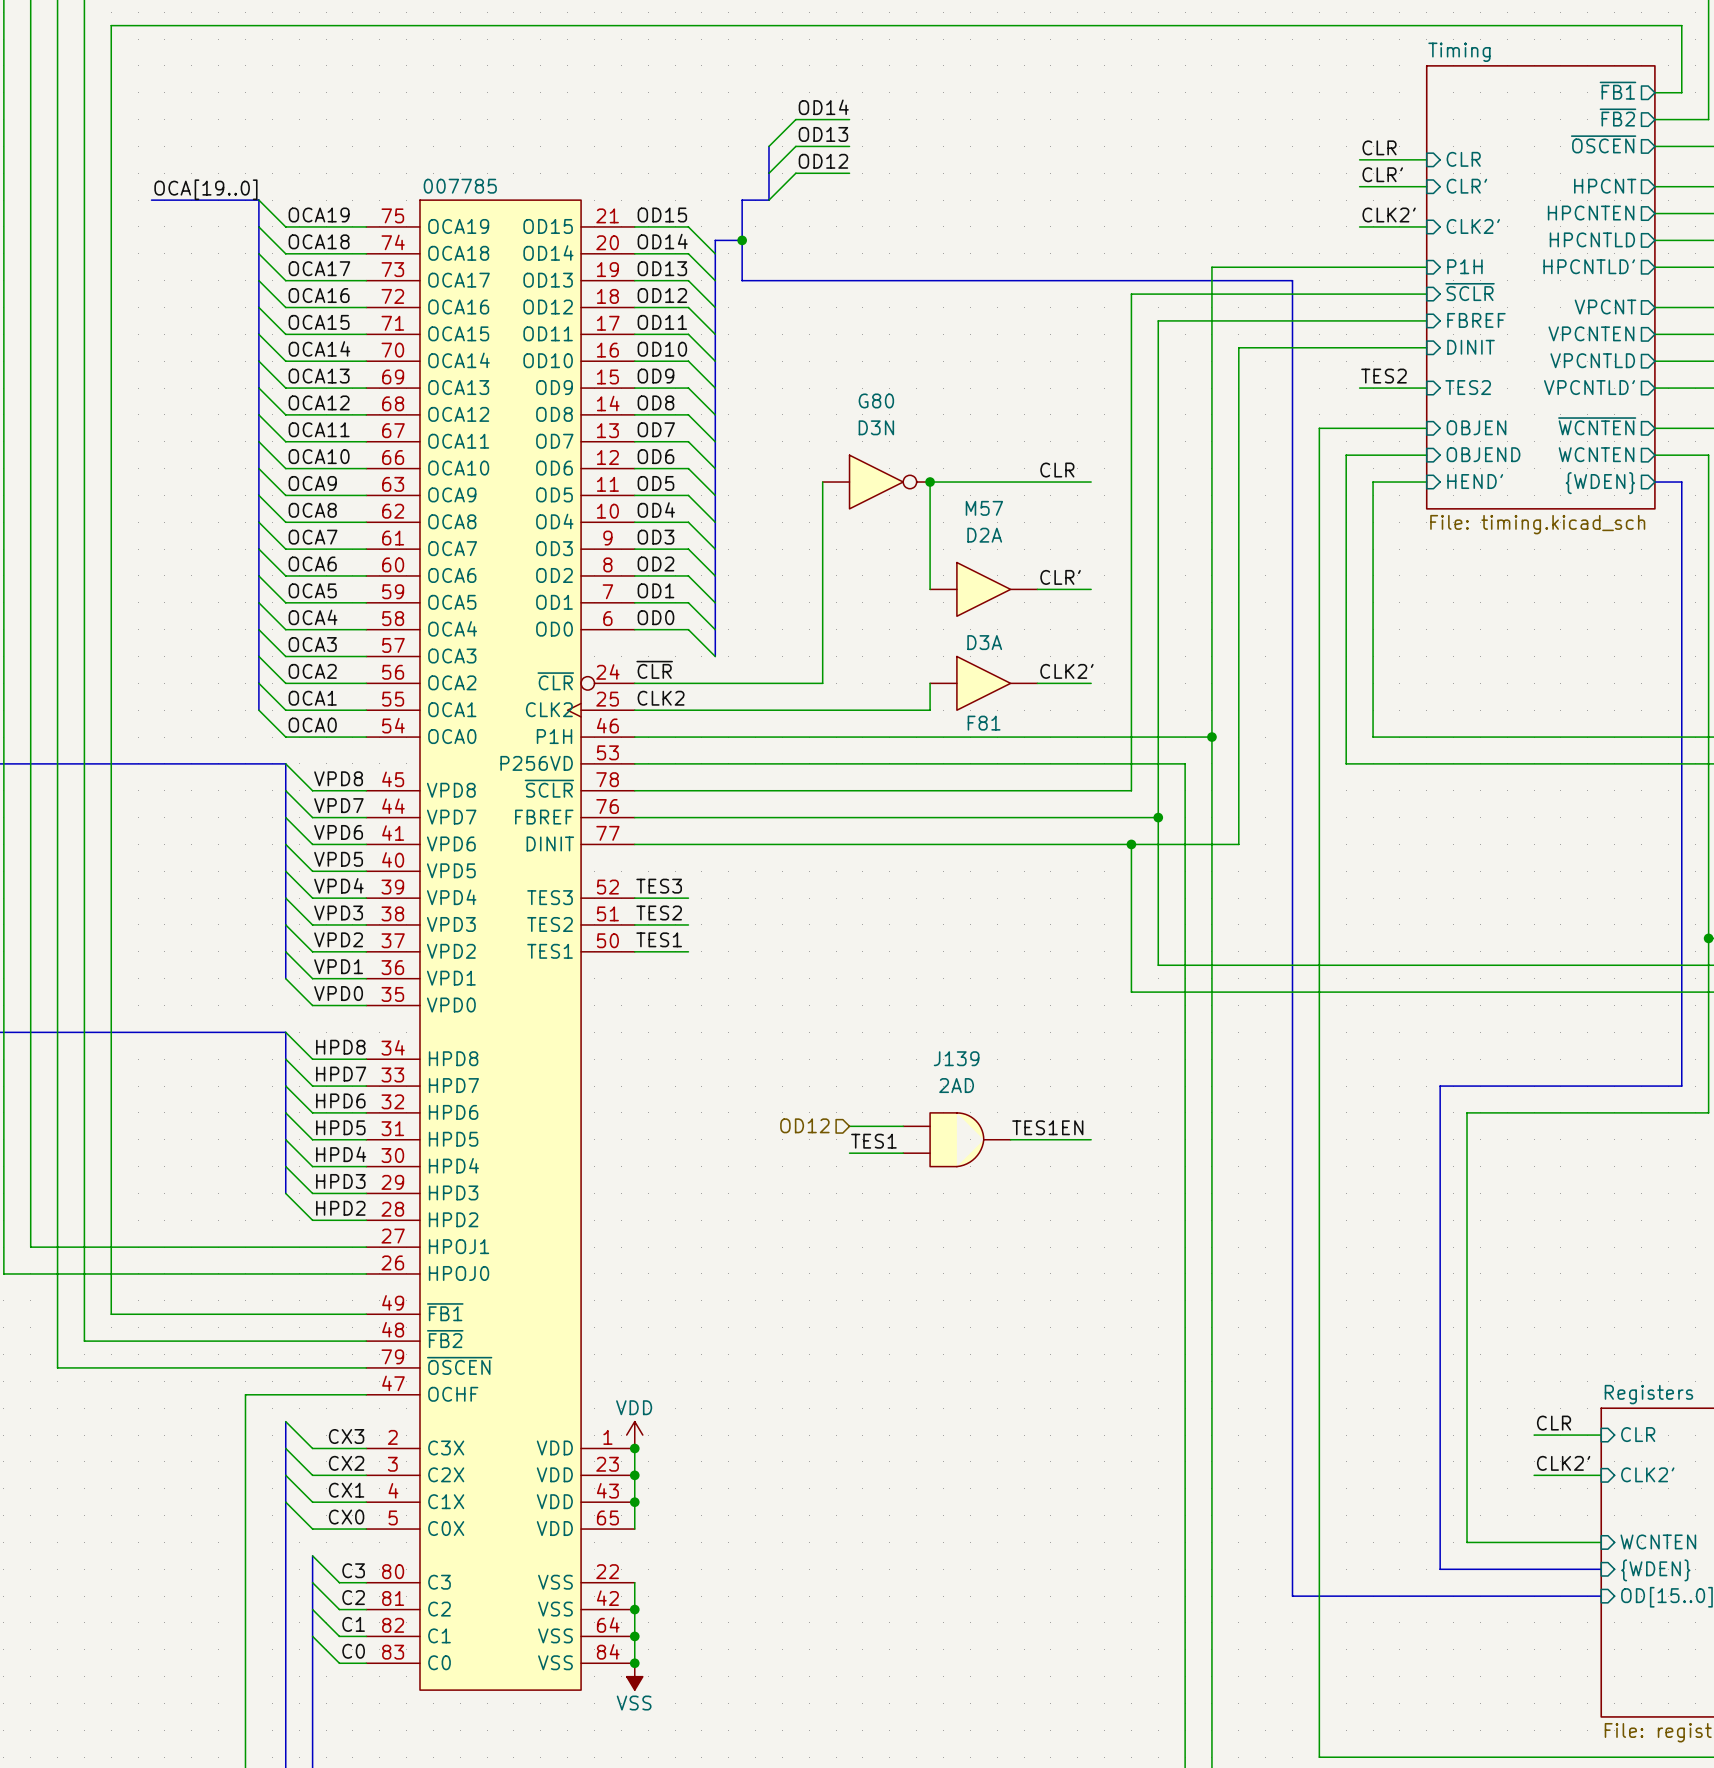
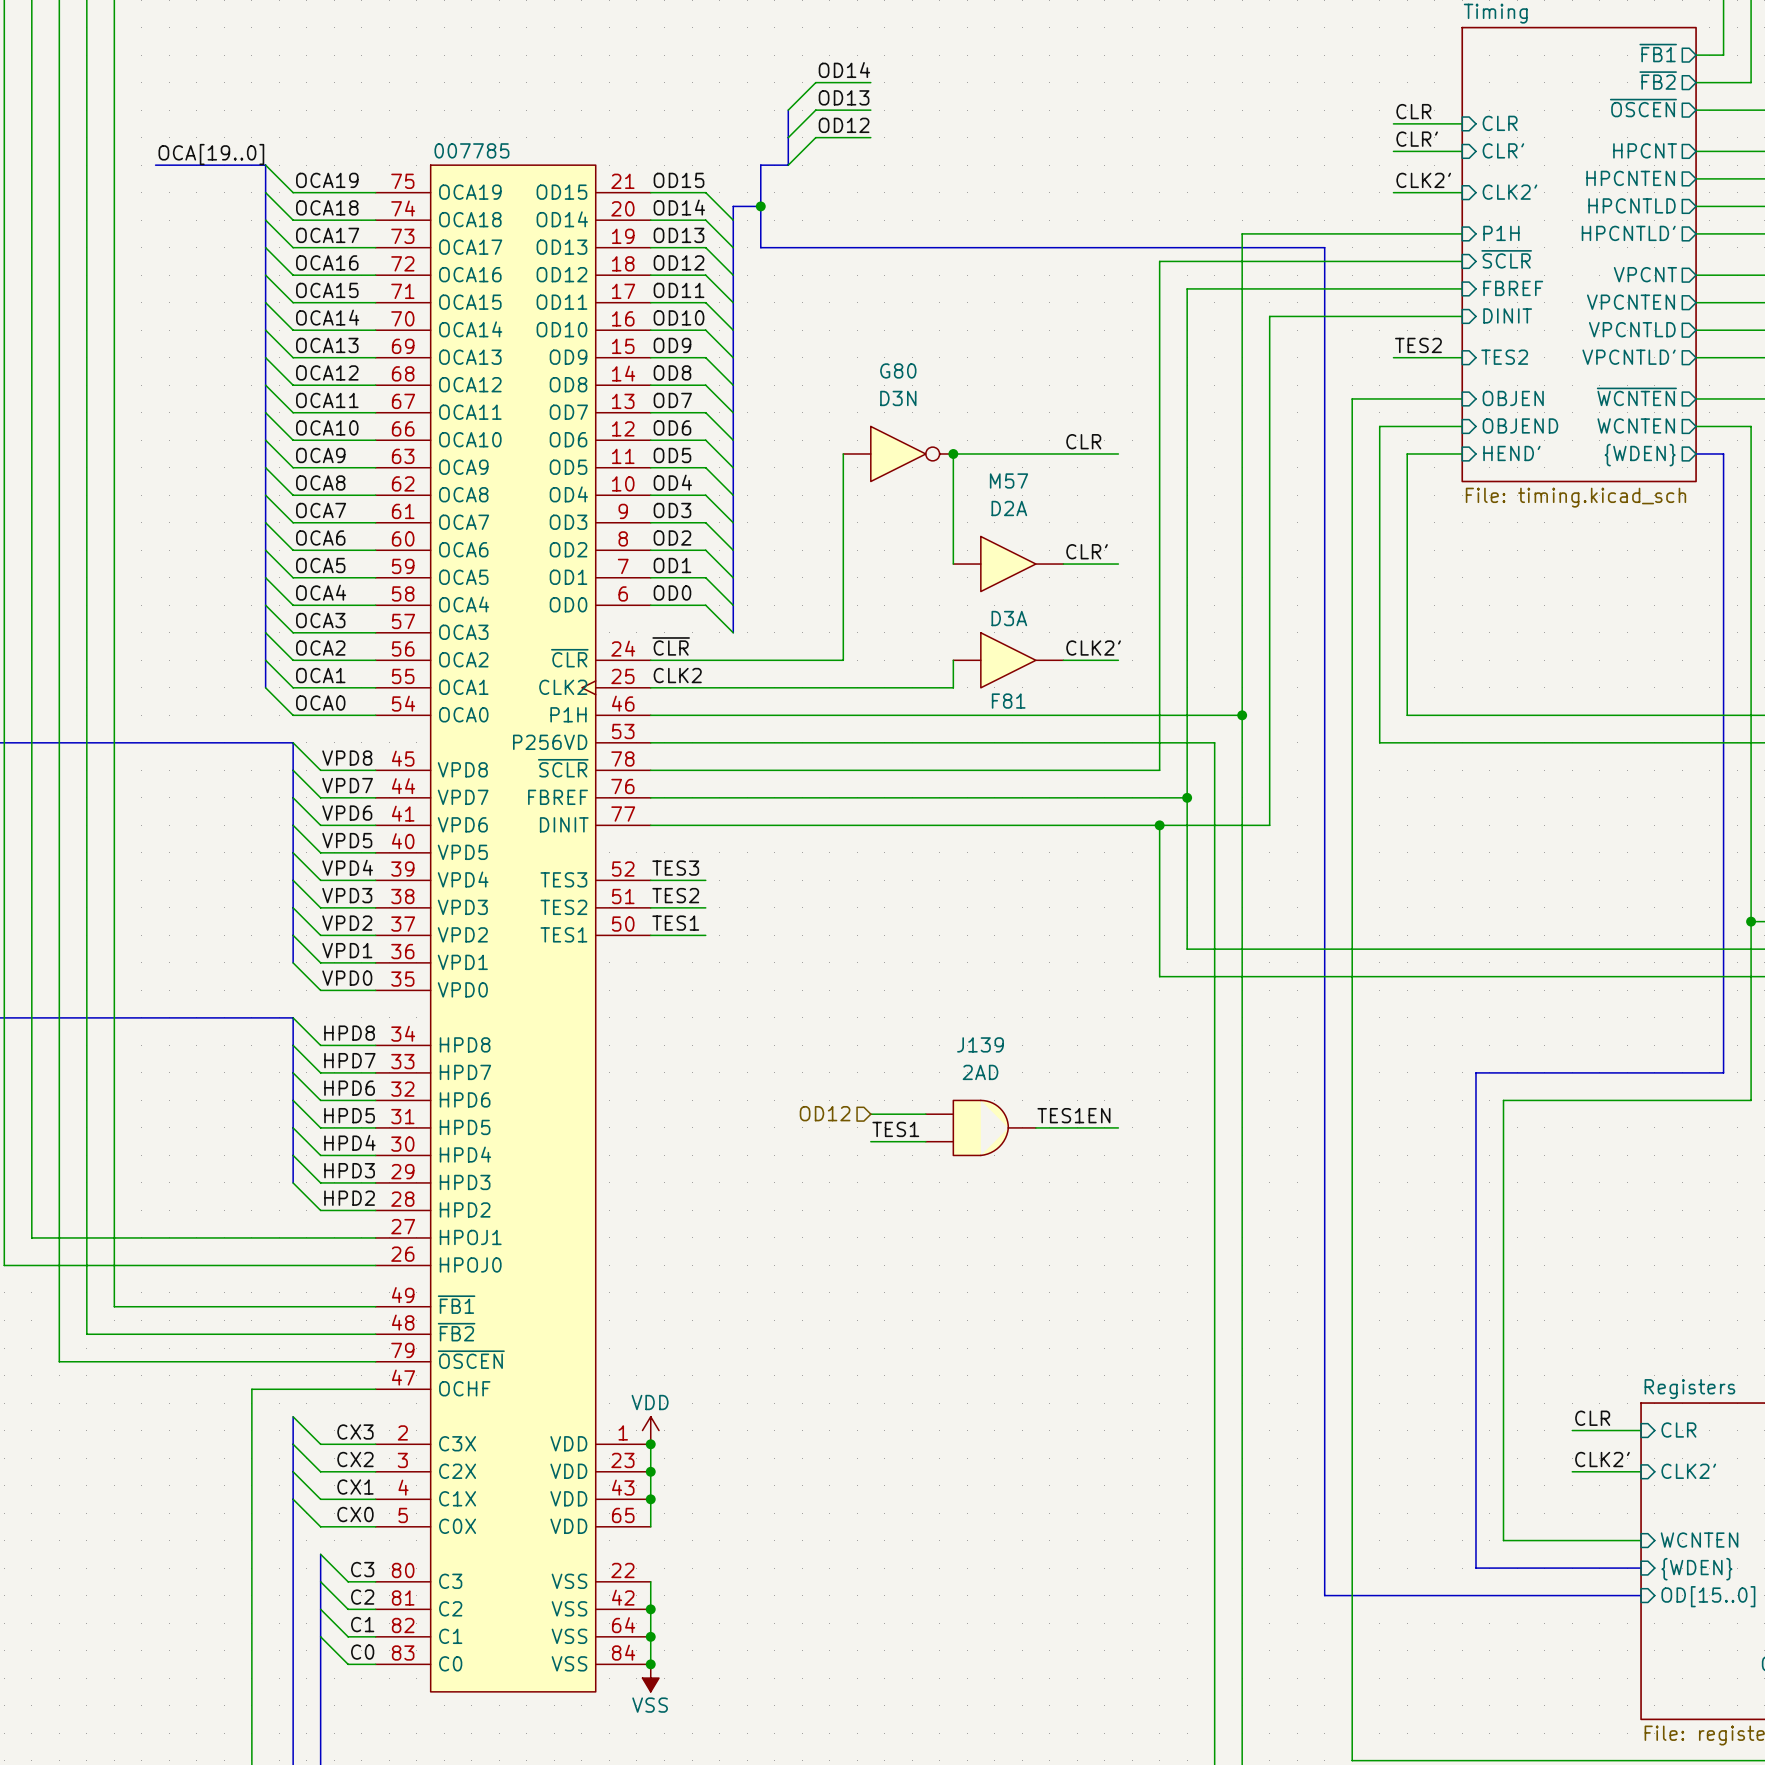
part symbol: [366, 200, 635, 1691] -> [375, 165, 651, 1692]

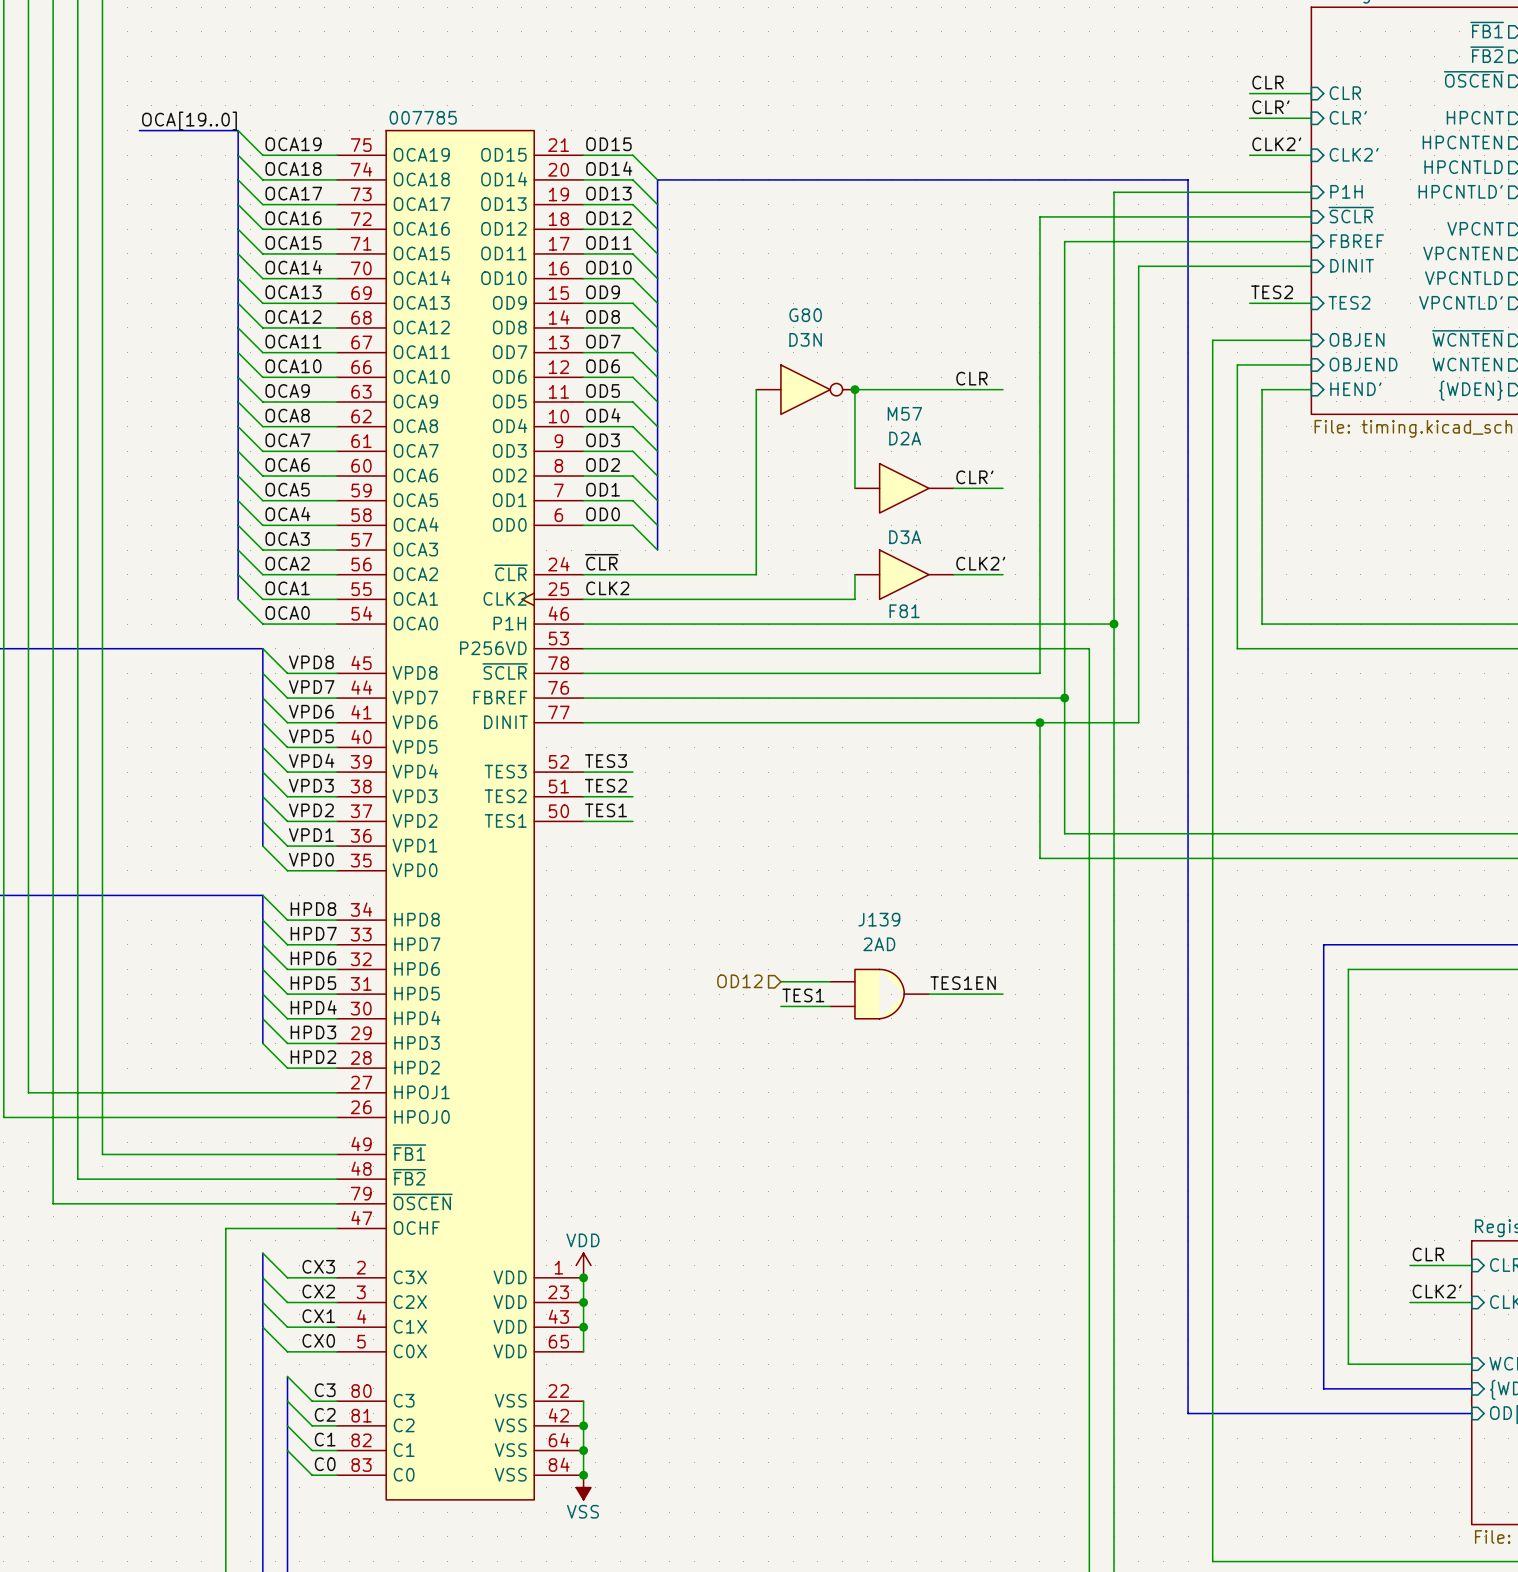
label: OD14 (844, 70) -> none
wire: (870, 82) (815, 82) (788, 110) -> none
label: OD13 (844, 97) -> none
bus: (788, 110) (788, 165) (760, 165) (760, 247) (1324, 247) -> (657, 179) (1188, 179) (1188, 204)
wire: (870, 110) (815, 110) (788, 137) -> none
label: OD12 (844, 125) -> none
wire: (870, 137) (815, 137) (788, 165) -> none
bus: (760, 206) (733, 206) (733, 220) -> none
junction: (760, 206) -> none

